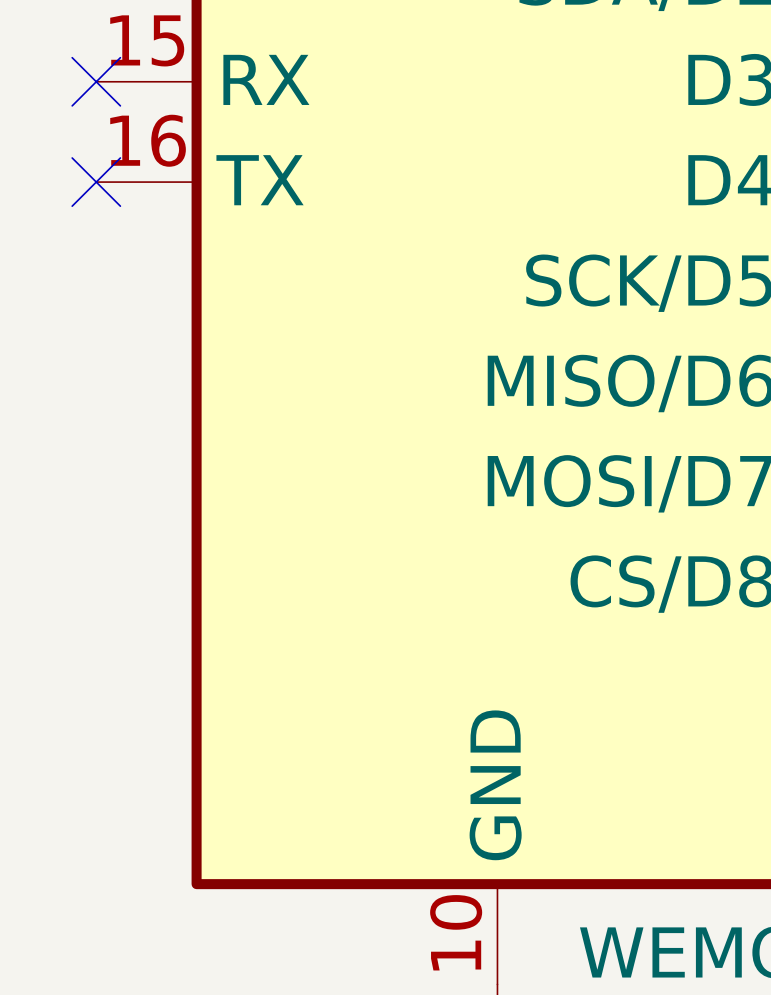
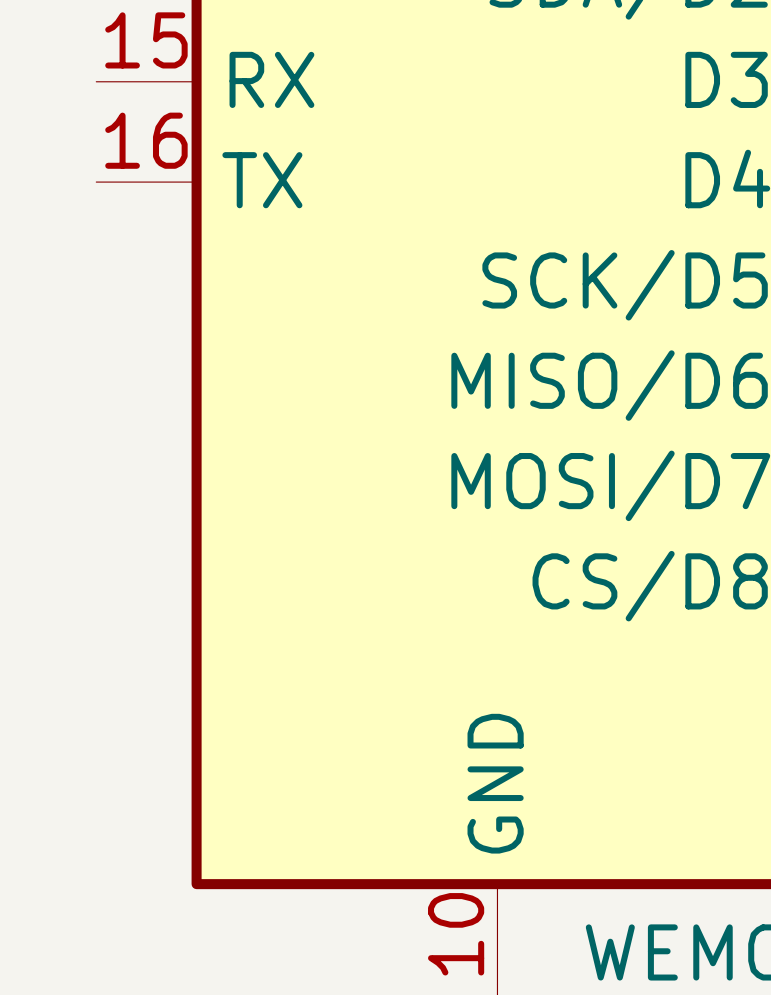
no-connect mark: (96, 81) -> none
no-connect mark: (96, 182) -> none

